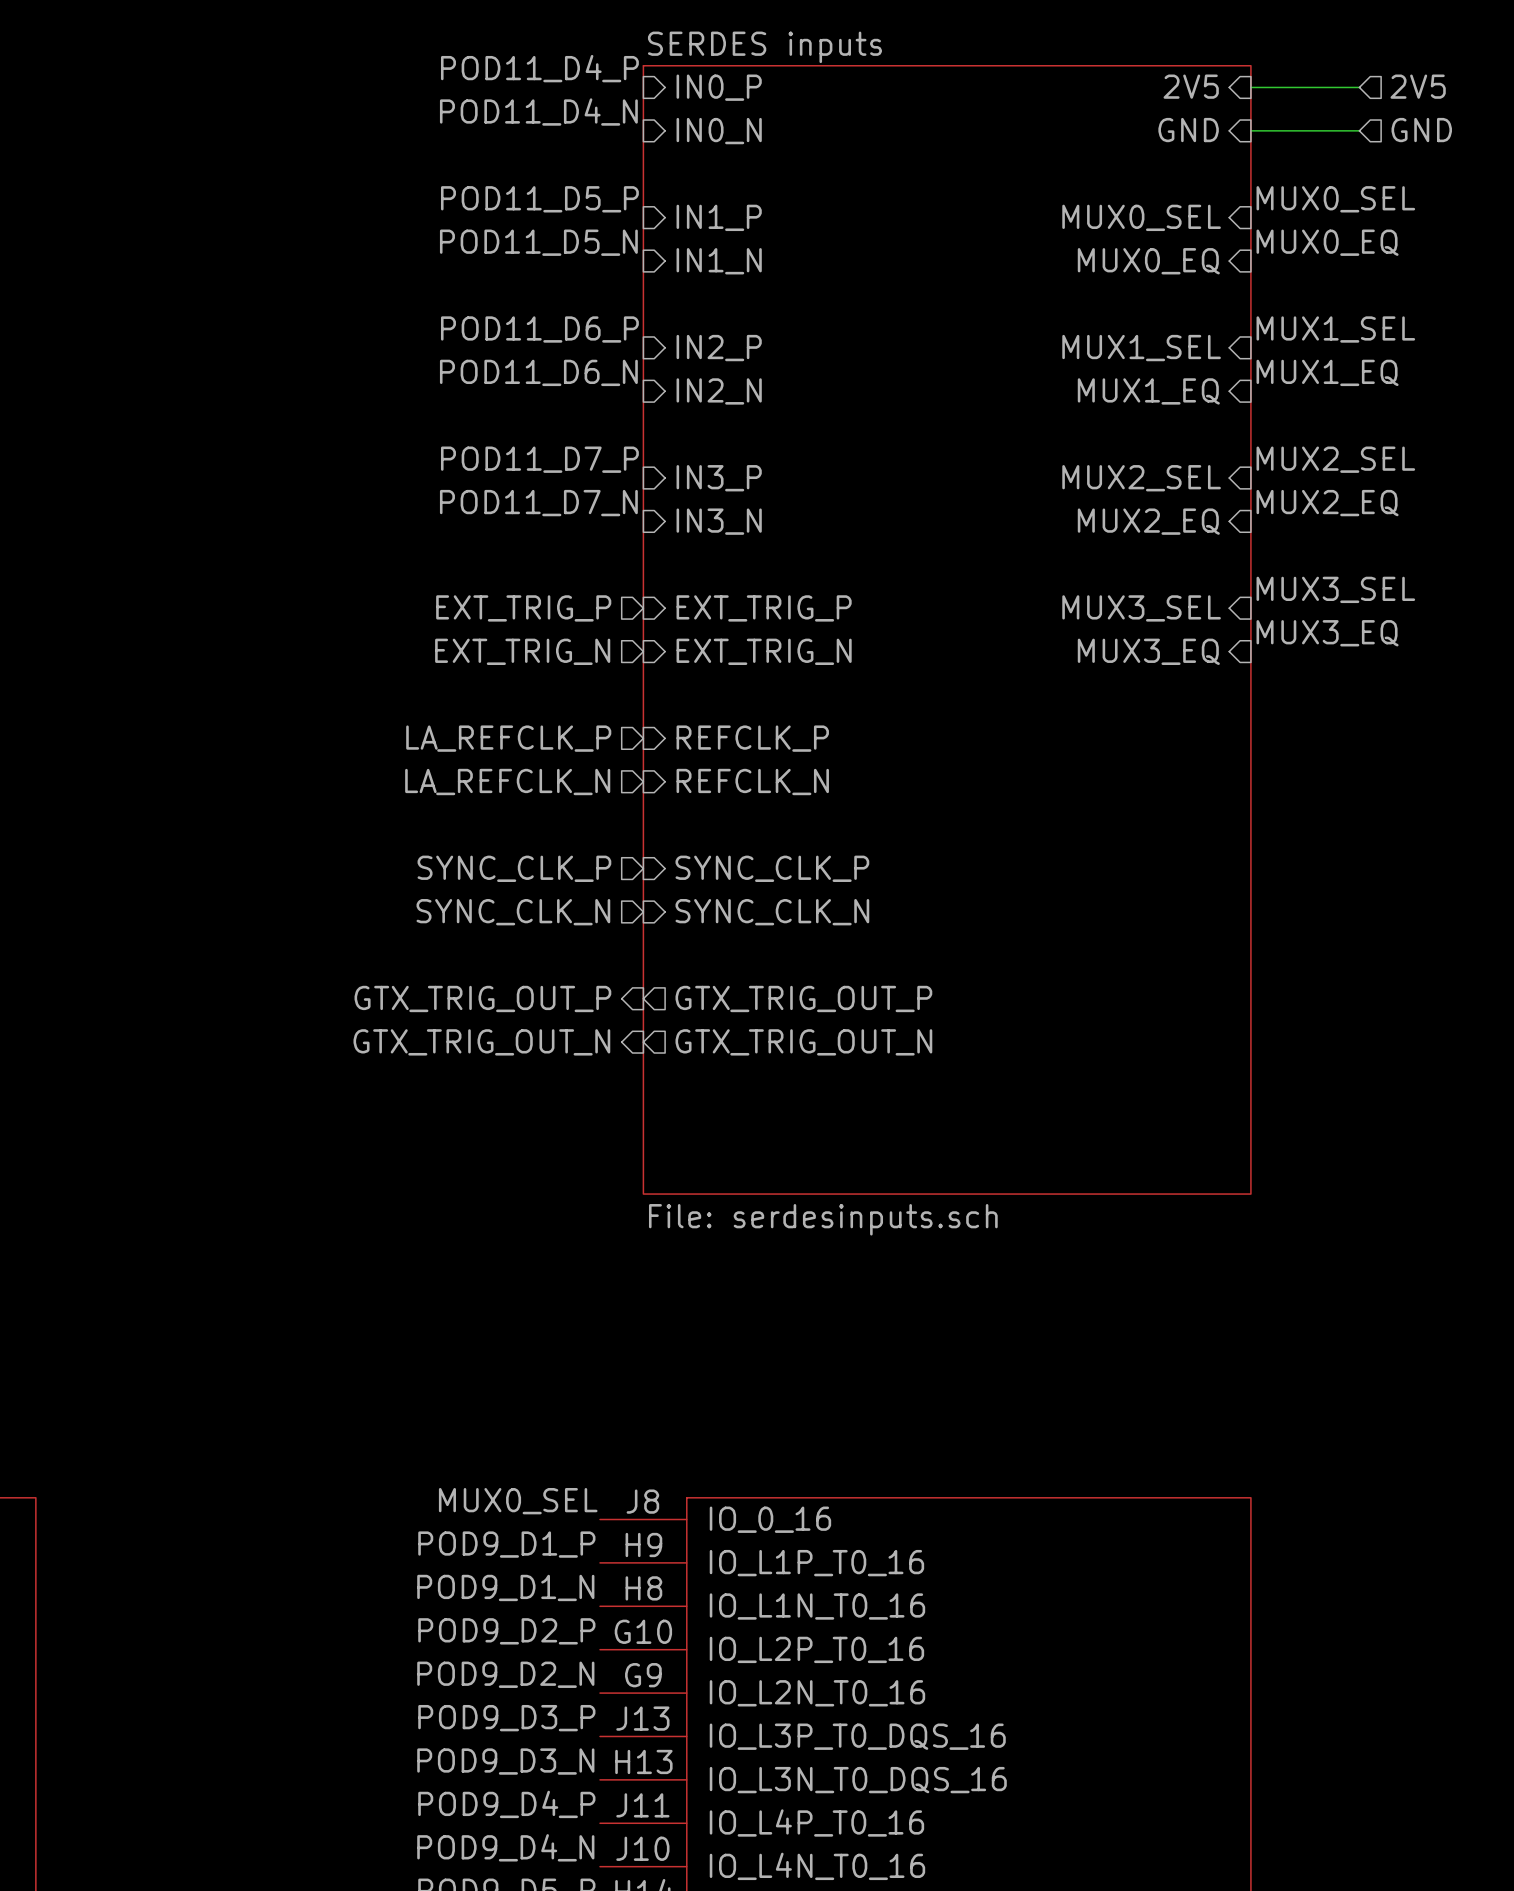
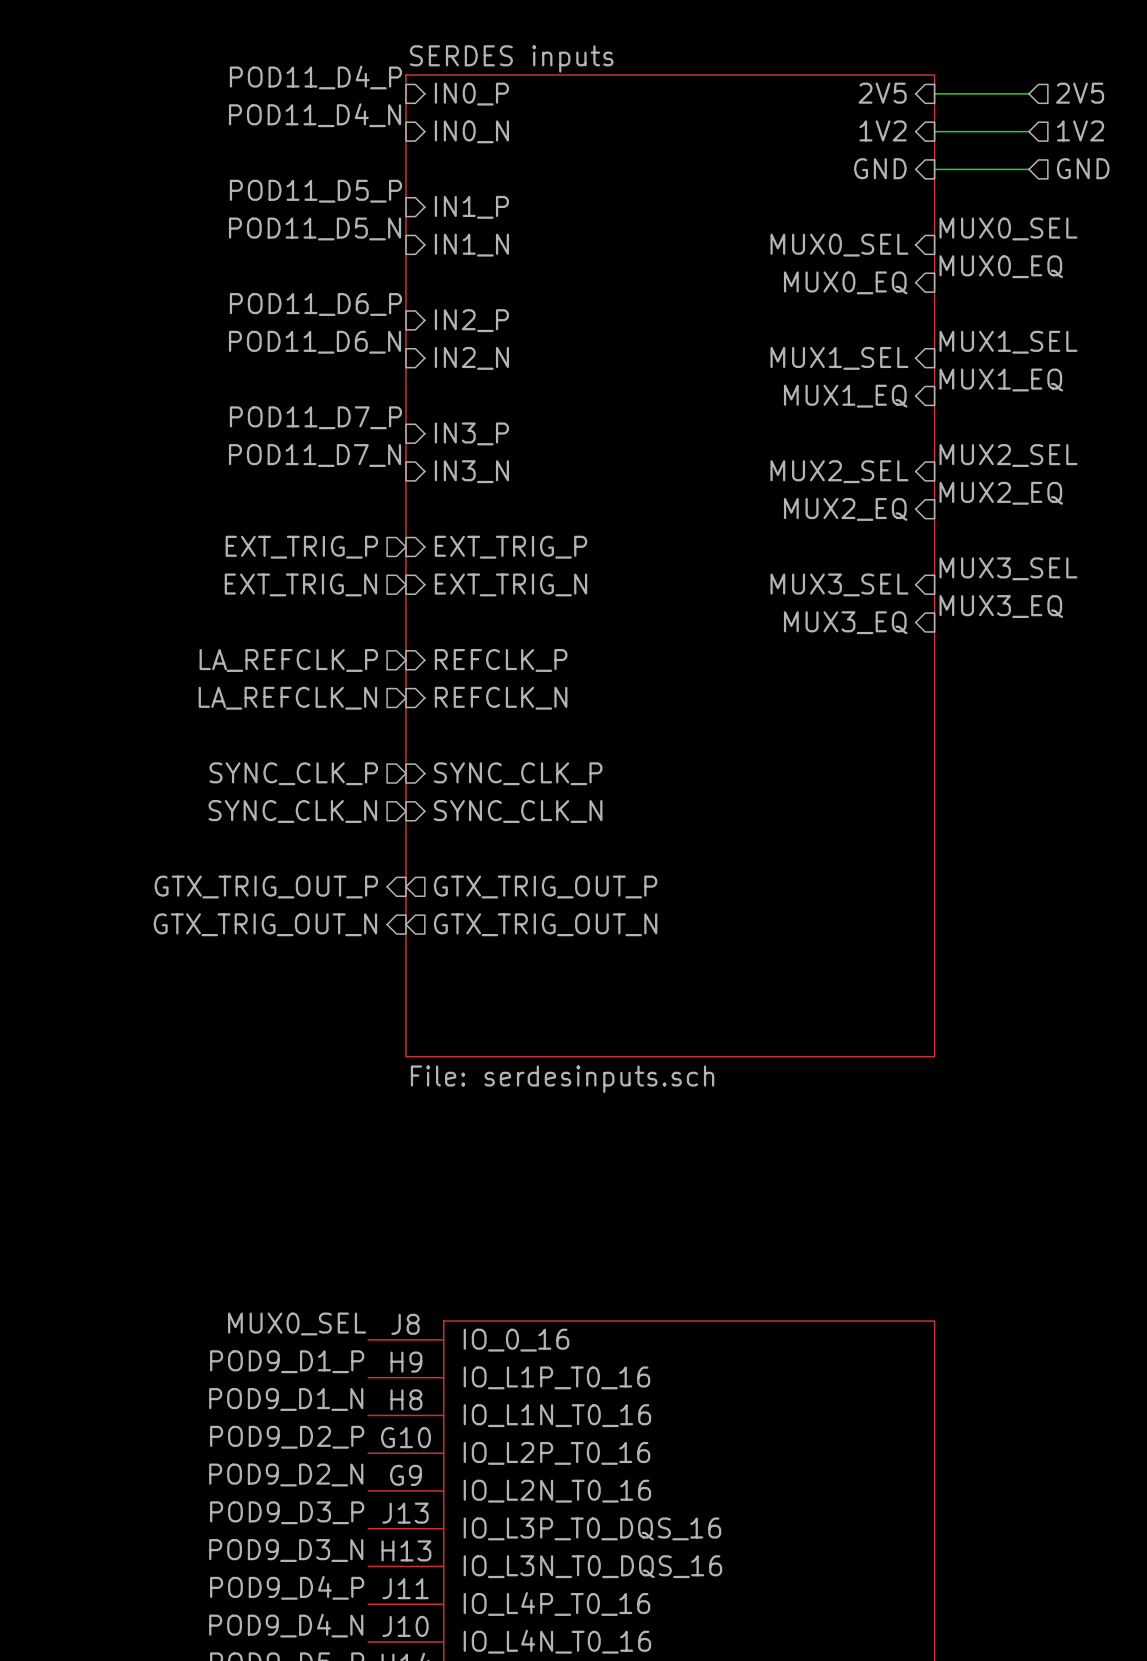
sheet pin: GND (1188, 130) -> 1V2 (883, 130)
hierarchical label: GND (1421, 130) -> 1V2 (1080, 130)
sheet pin: none -> GND (880, 168)
hierarchical label: none -> GND (1083, 168)
wire: none -> (934, 169) (1028, 169)
label: MUX0_SEL (1335, 199) -> none
sheet pin: MUX0_SEL (1141, 217) -> none
label: MUX0_EQ (1327, 242) -> MUX0_SEL (1008, 228)
sheet pin: MUX0_EQ (1148, 261) -> MUX0_SEL (839, 245)
label: MUX1_SEL (1335, 329) -> MUX0_EQ (1001, 266)
sheet pin: MUX1_SEL (1141, 348) -> MUX0_EQ (845, 282)
label: MUX1_EQ (1327, 372) -> MUX1_SEL (1008, 342)
sheet pin: MUX1_EQ (1148, 391) -> MUX1_SEL (839, 358)
label: MUX2_SEL (1335, 459) -> MUX1_EQ (1001, 380)
sheet pin: MUX2_SEL (1141, 478) -> MUX1_EQ (845, 396)
label: MUX2_EQ (1327, 503) -> MUX2_SEL (1008, 455)
sheet pin: MUX2_EQ (1148, 521) -> MUX2_SEL (839, 471)
label: MUX3_SEL (1335, 589) -> MUX2_EQ (1001, 493)
sheet pin: MUX3_SEL (1141, 608) -> MUX2_EQ (845, 509)
label: MUX3_EQ (1327, 633) -> MUX3_SEL (1008, 568)
sheet pin: MUX3_EQ (1148, 651) -> MUX3_SEL (839, 584)
label: none -> MUX3_EQ (1001, 606)
sheet pin: none -> MUX3_EQ (845, 622)

